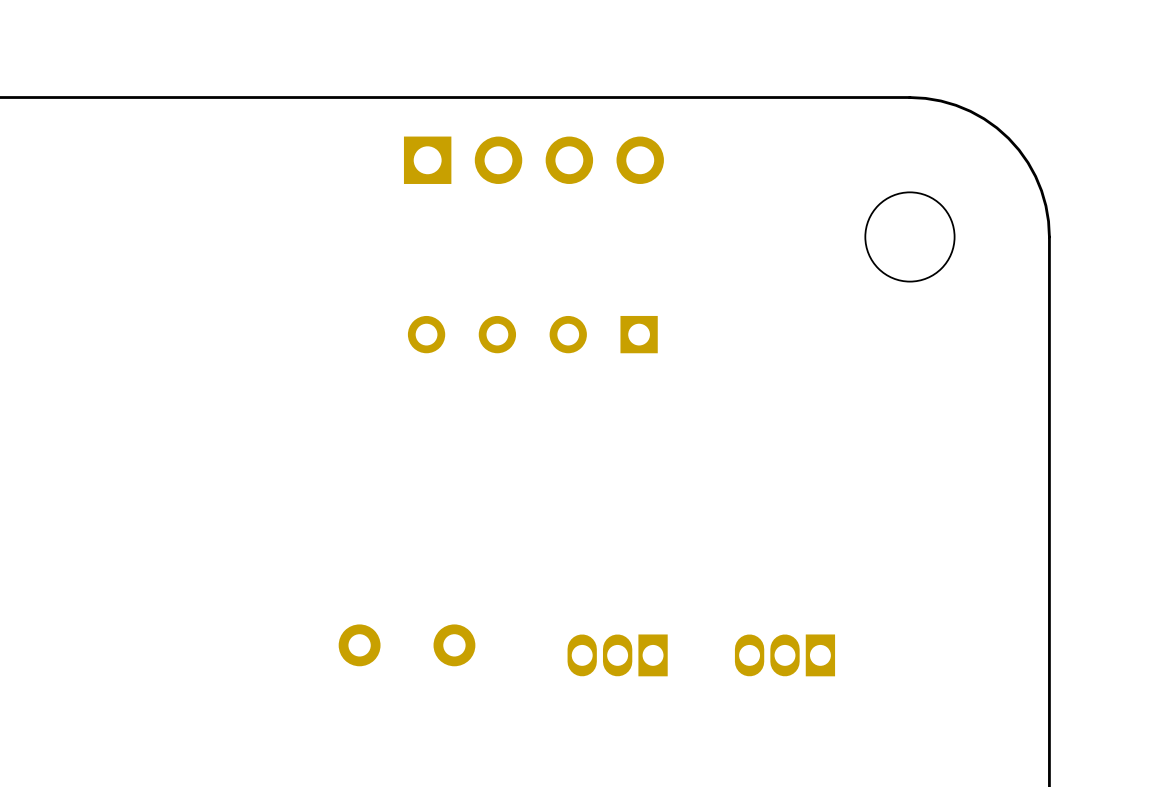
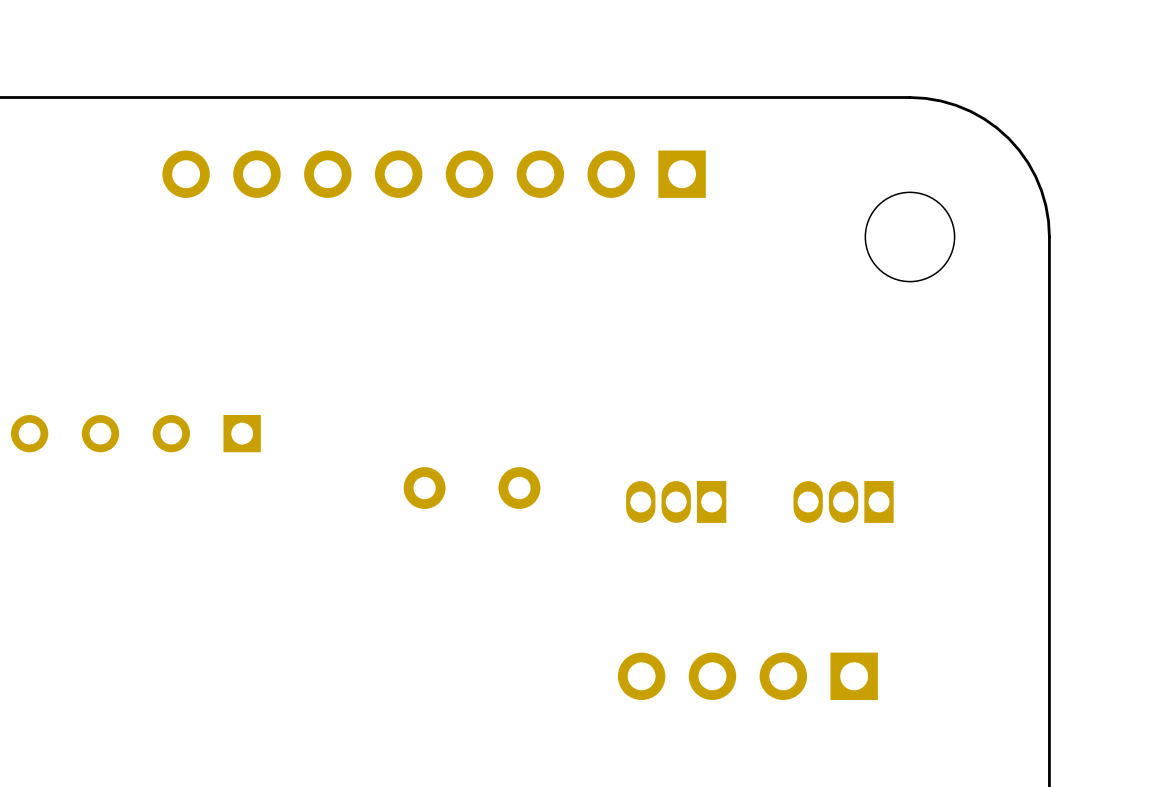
part rotation: 0° (533, 160) -> 180° (747, 676)
part position: (533, 160) -> (747, 676)
part: none -> (434, 174)
part position: (532, 334) -> (135, 433)
part: none -> (676, 501)
part: none -> (843, 501)
part position: (407, 645) -> (472, 488)
part: (617, 655) -> none
part: (784, 655) -> none

